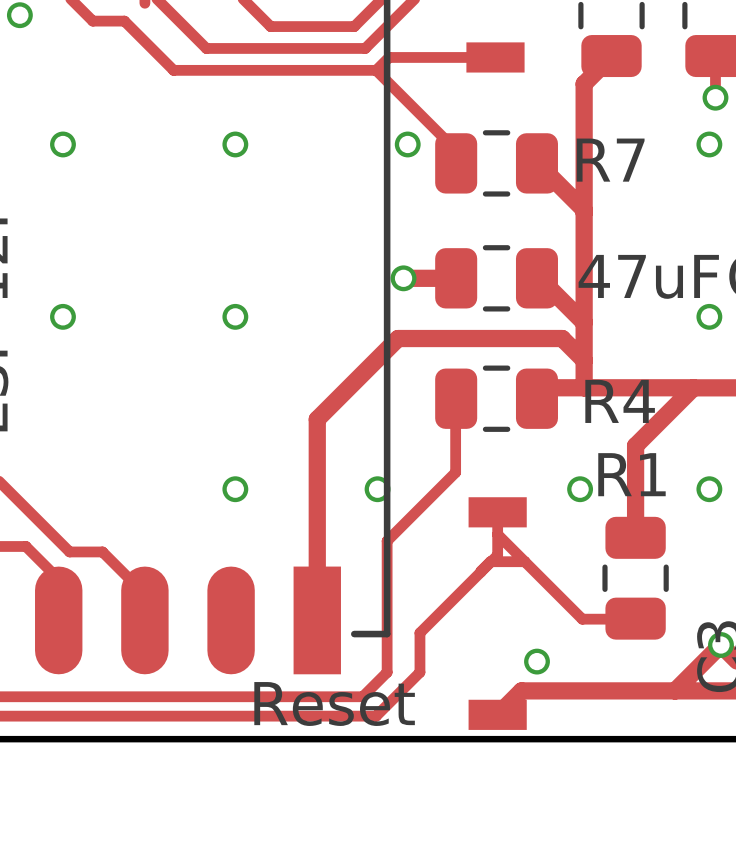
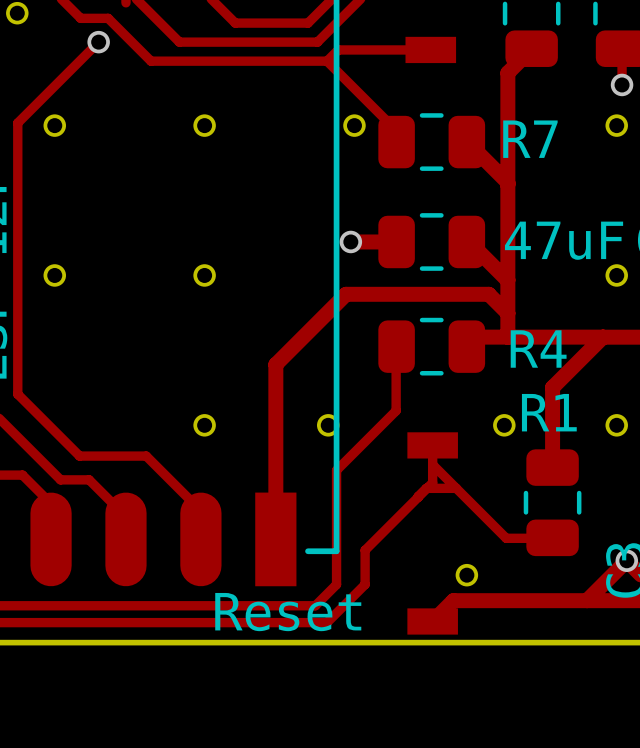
track: none -> (98, 42) (17, 123) (17, 394) (79, 456) (146, 456) (200, 510) (200, 513)
via: none -> (98, 42)

